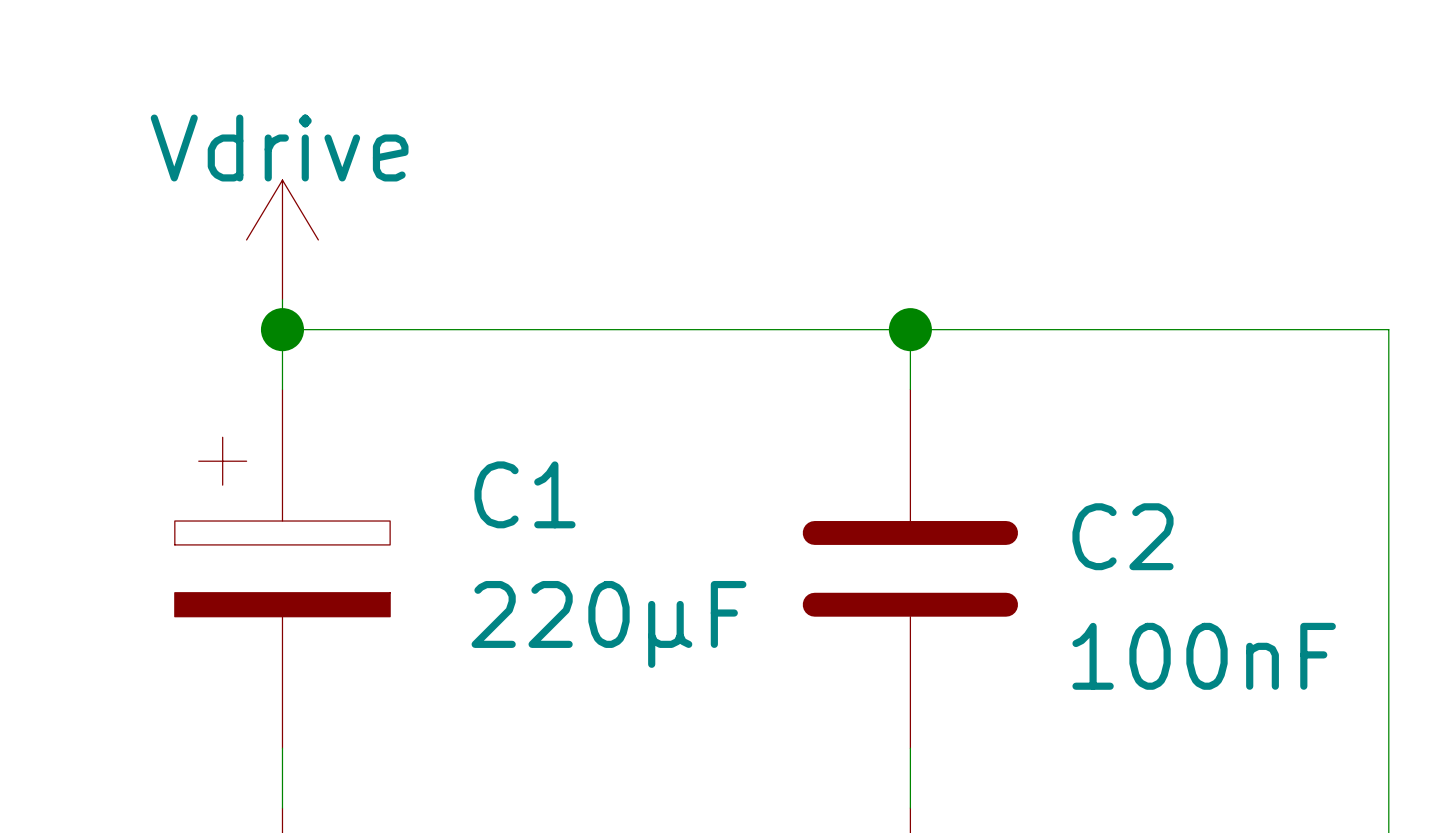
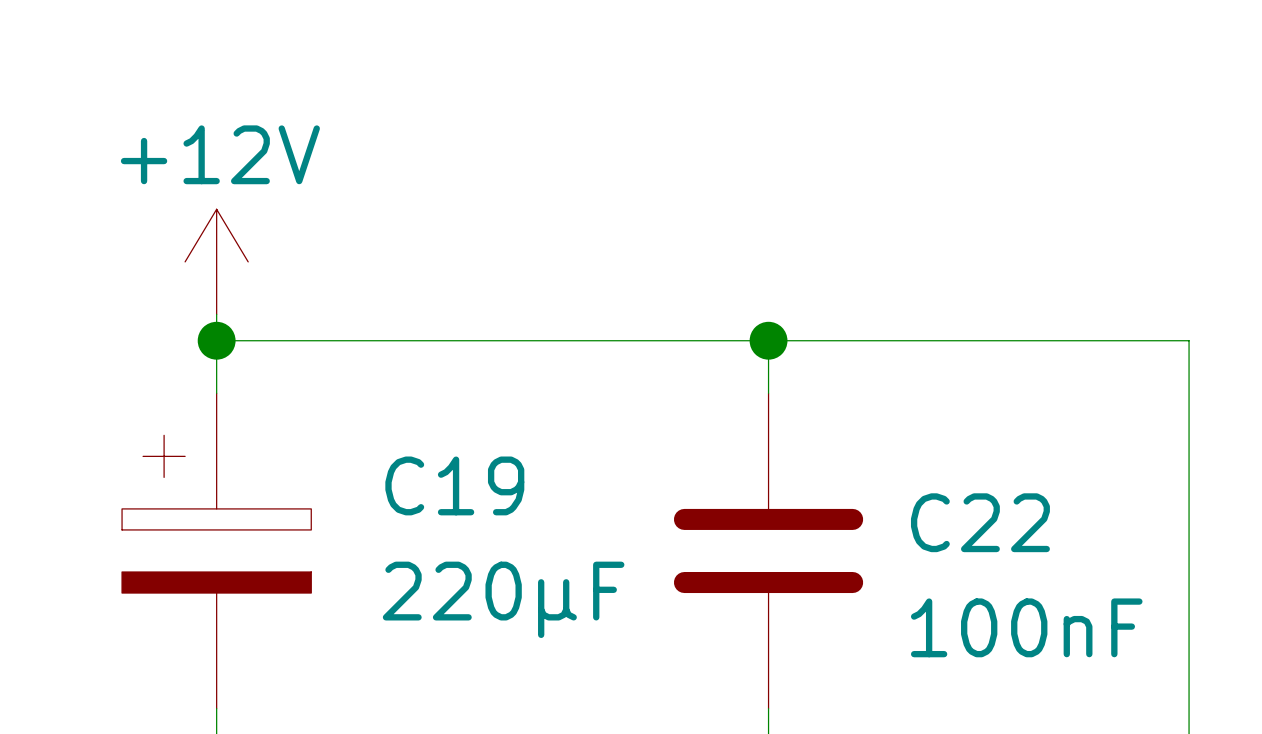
power symbol: Vdrive (282, 239) -> +12V (216, 261)
C1 name: C1 (524, 494) -> C19 (454, 485)
C2 name: C2 (1122, 536) -> C22 (980, 522)

